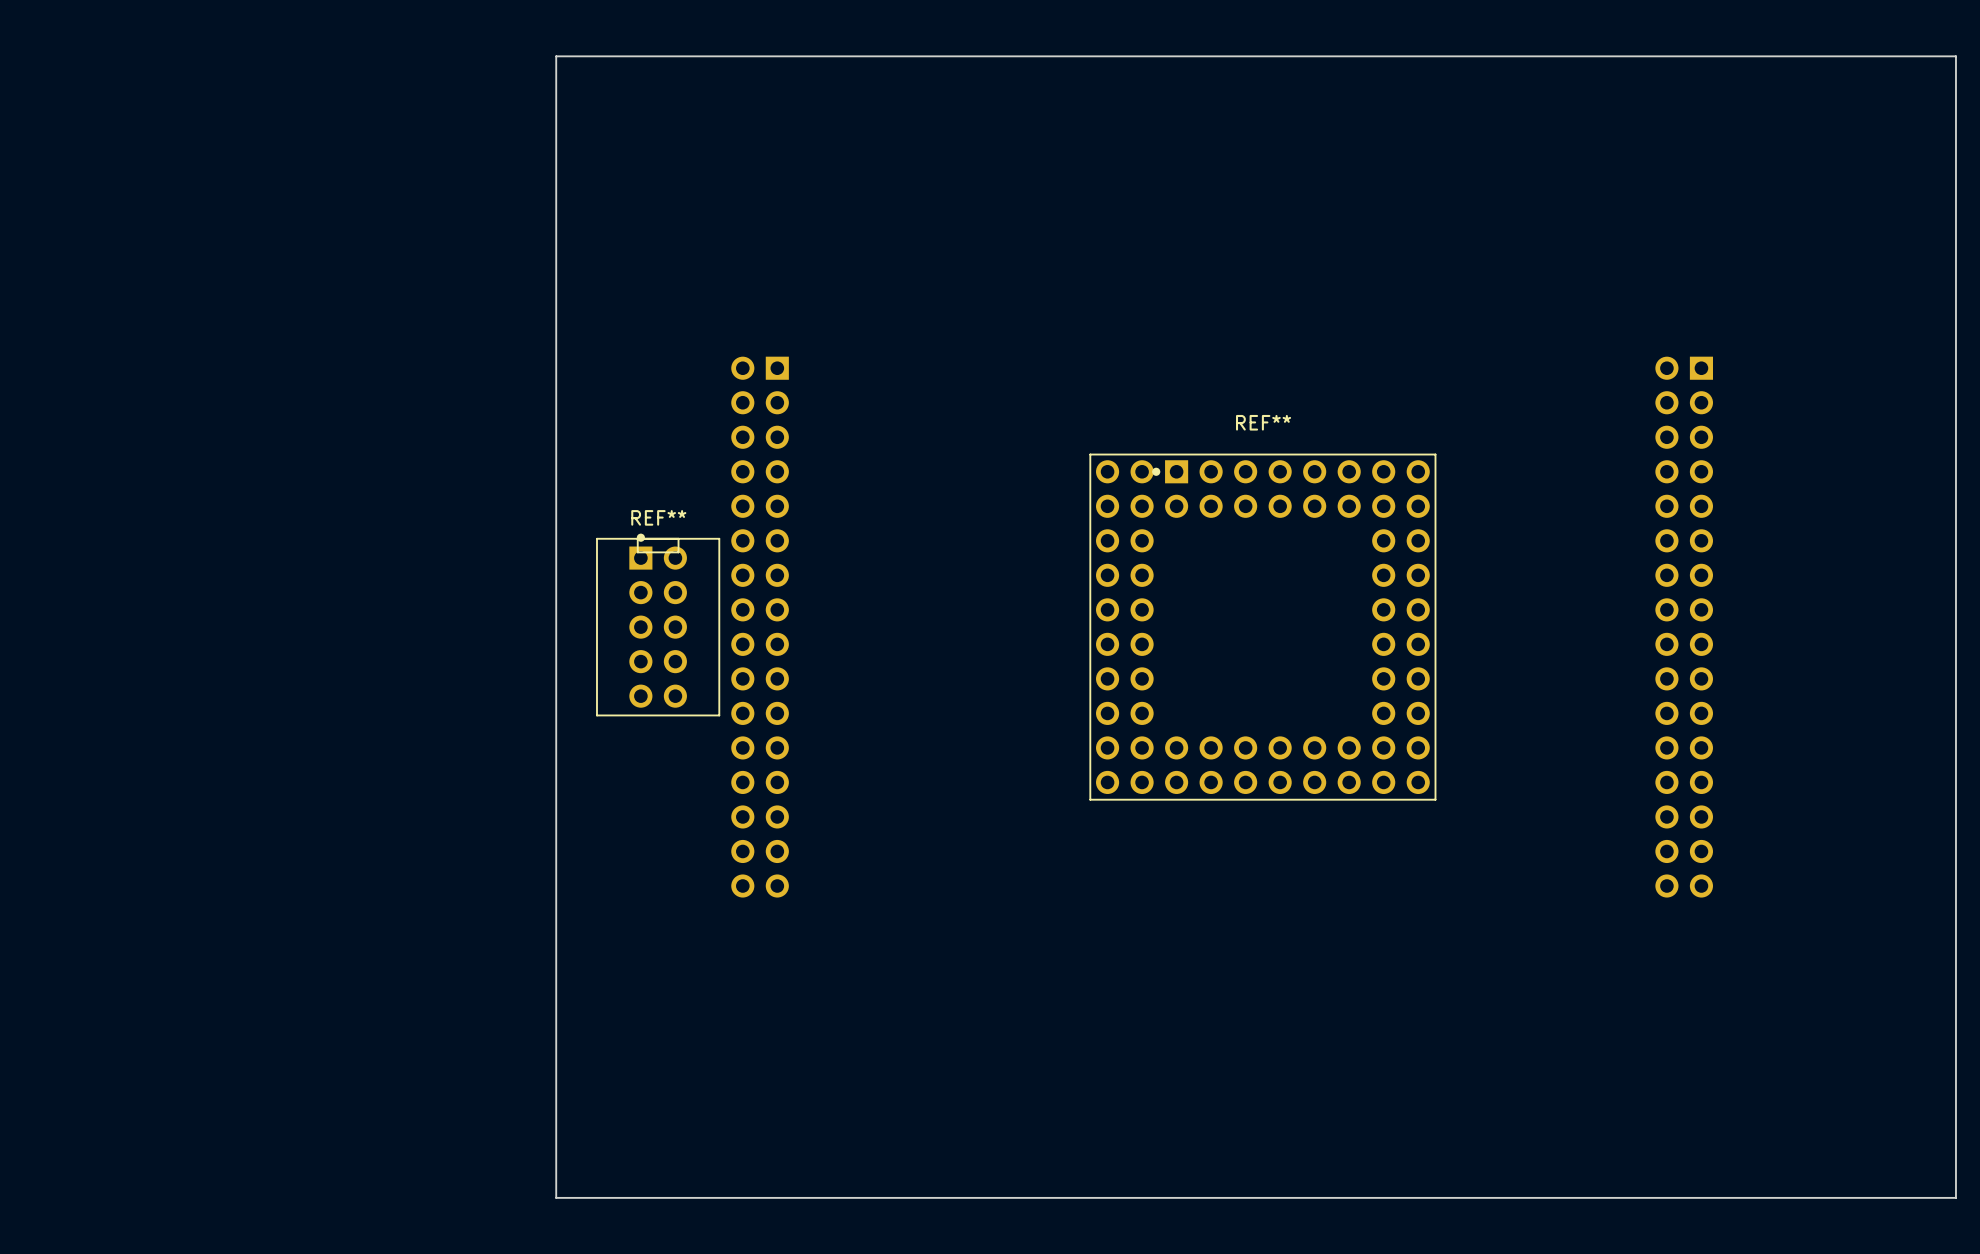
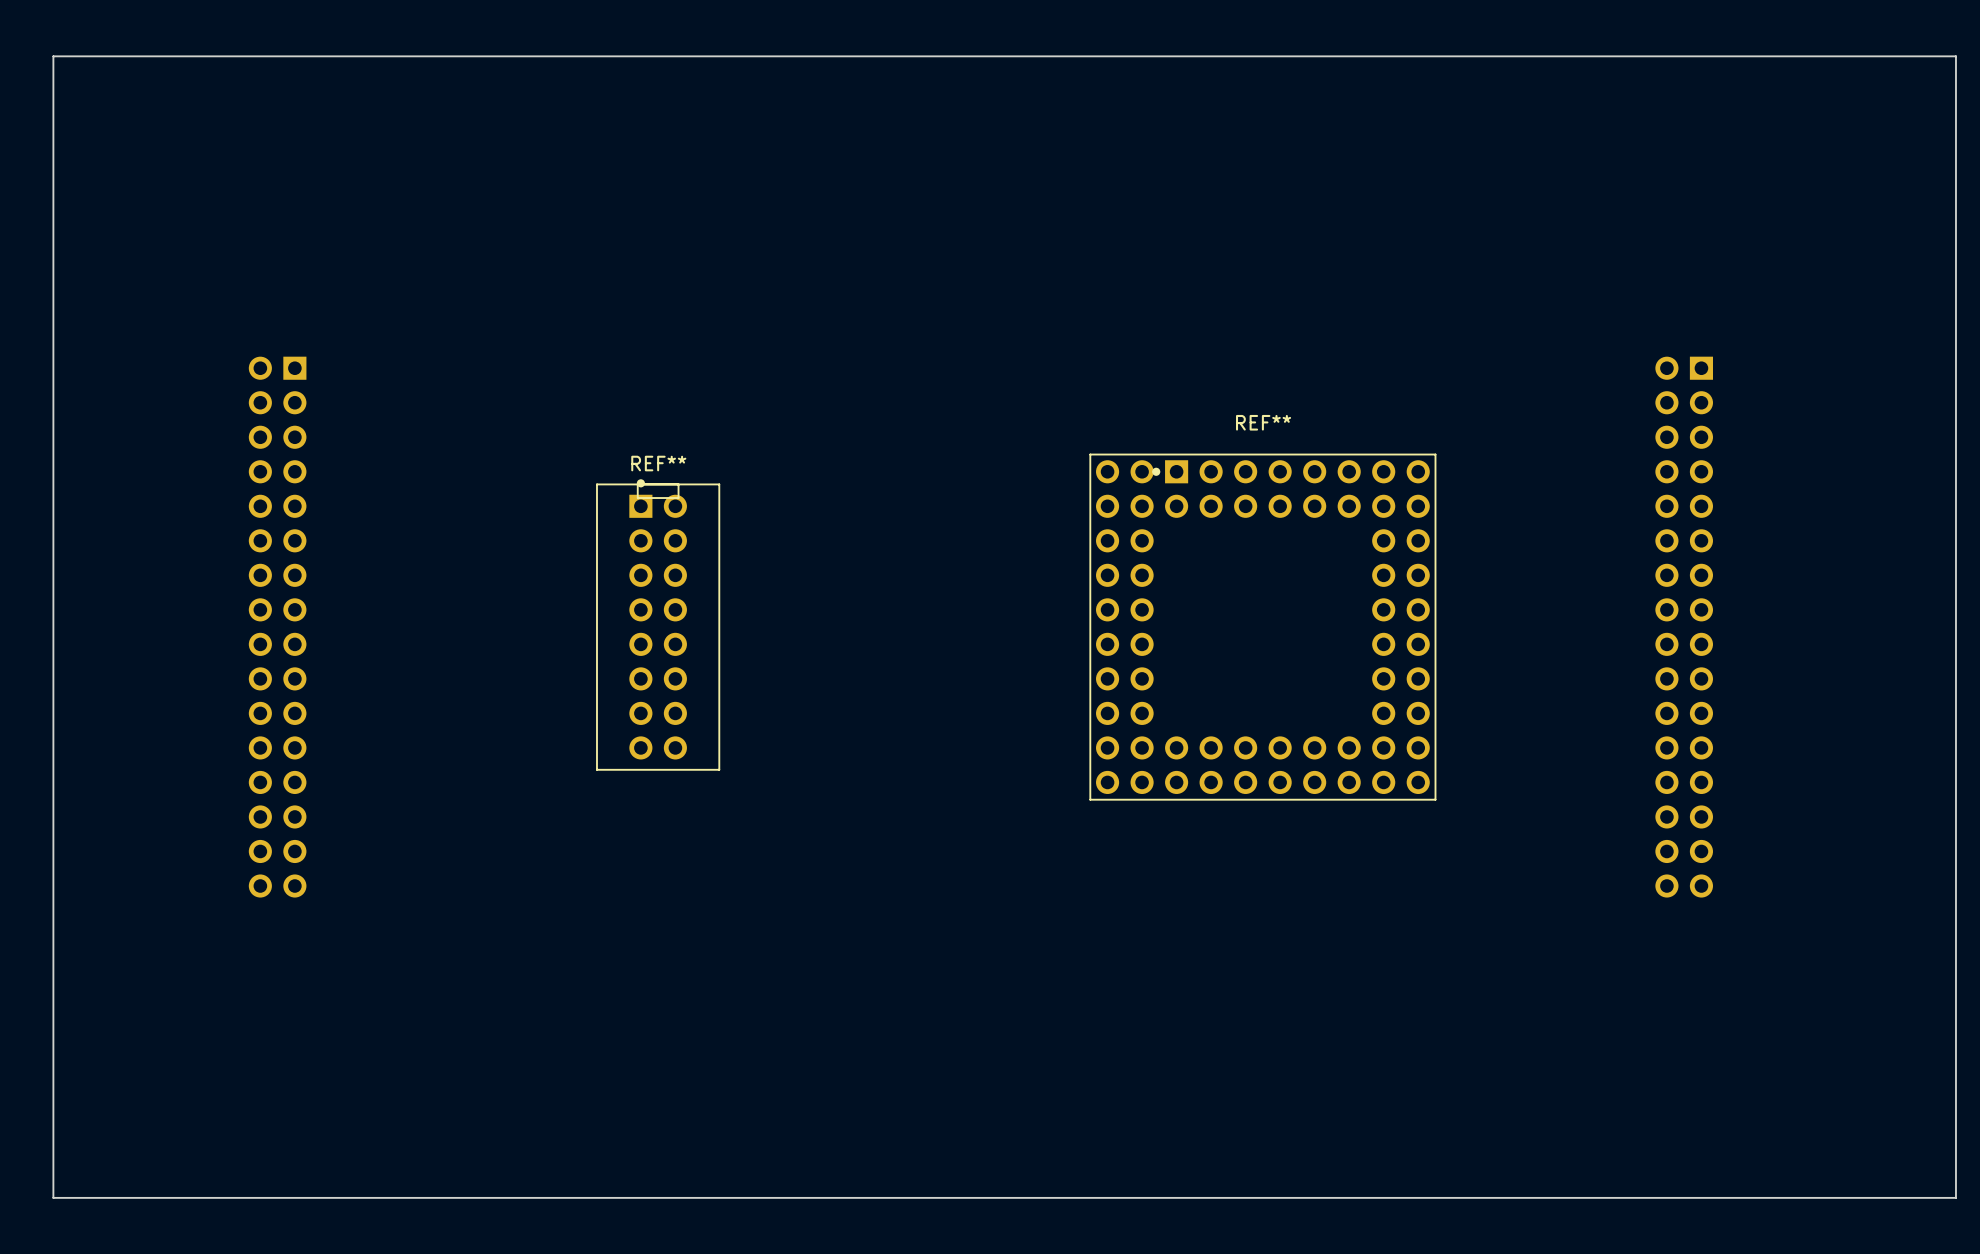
board edge: (556, 56) (556, 1197) -> (556, 56) (53, 56) (53, 1197) (556, 1197)
REF** name position: REF** (658, 517) -> REF** (658, 463)
REF** footprint: [596, 533, 720, 717] -> [596, 479, 720, 771]
part: none -> (277, 627)
part: (760, 627) -> none

